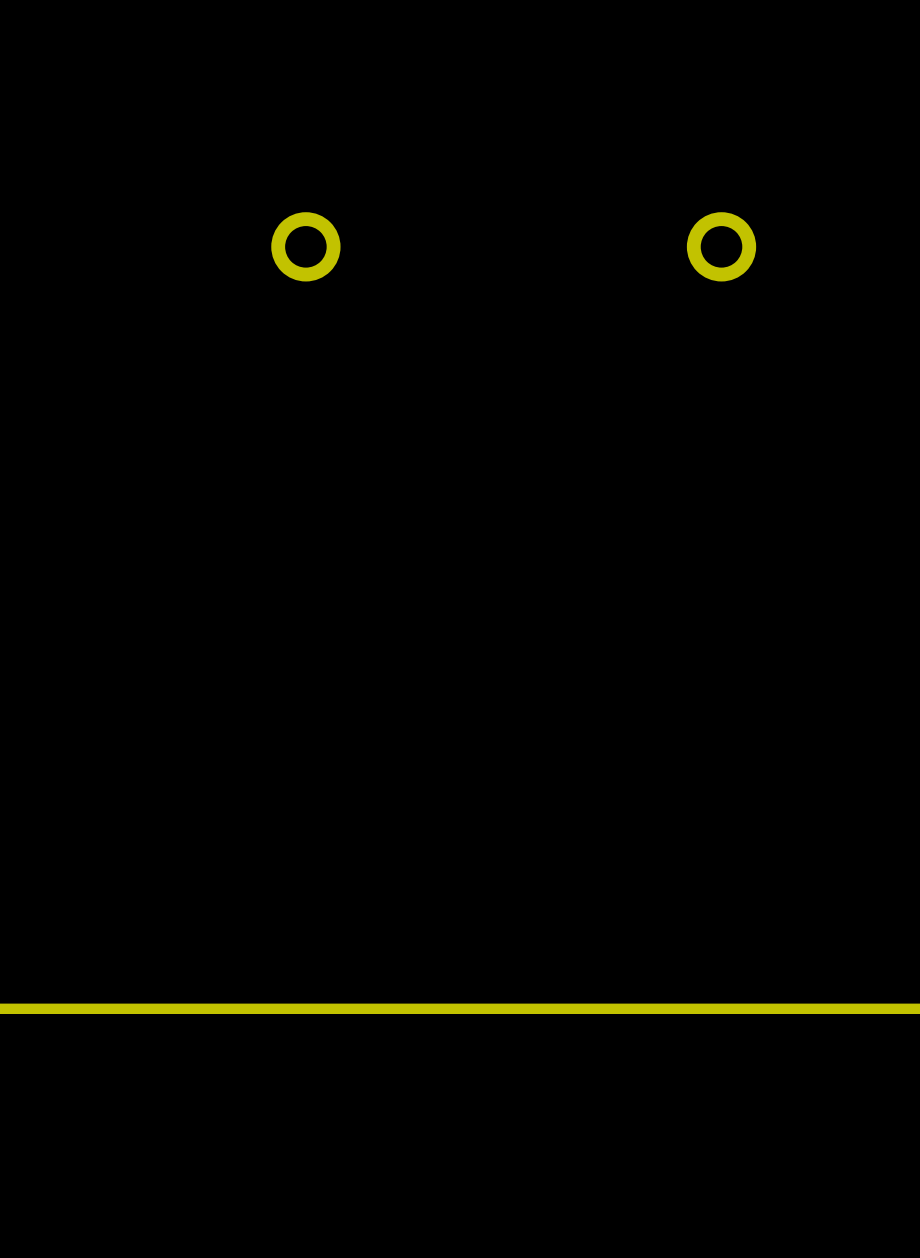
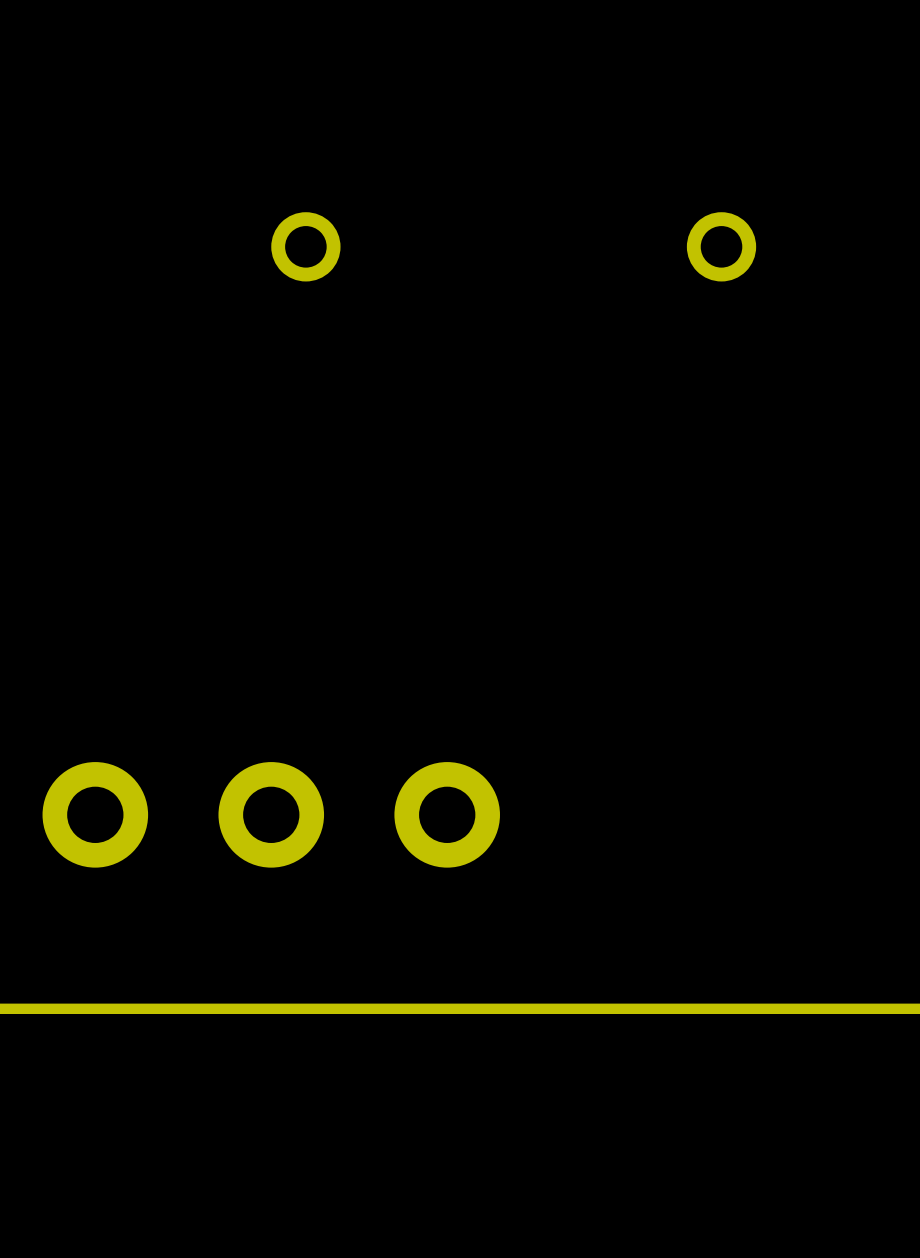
part: none -> (271, 814)

